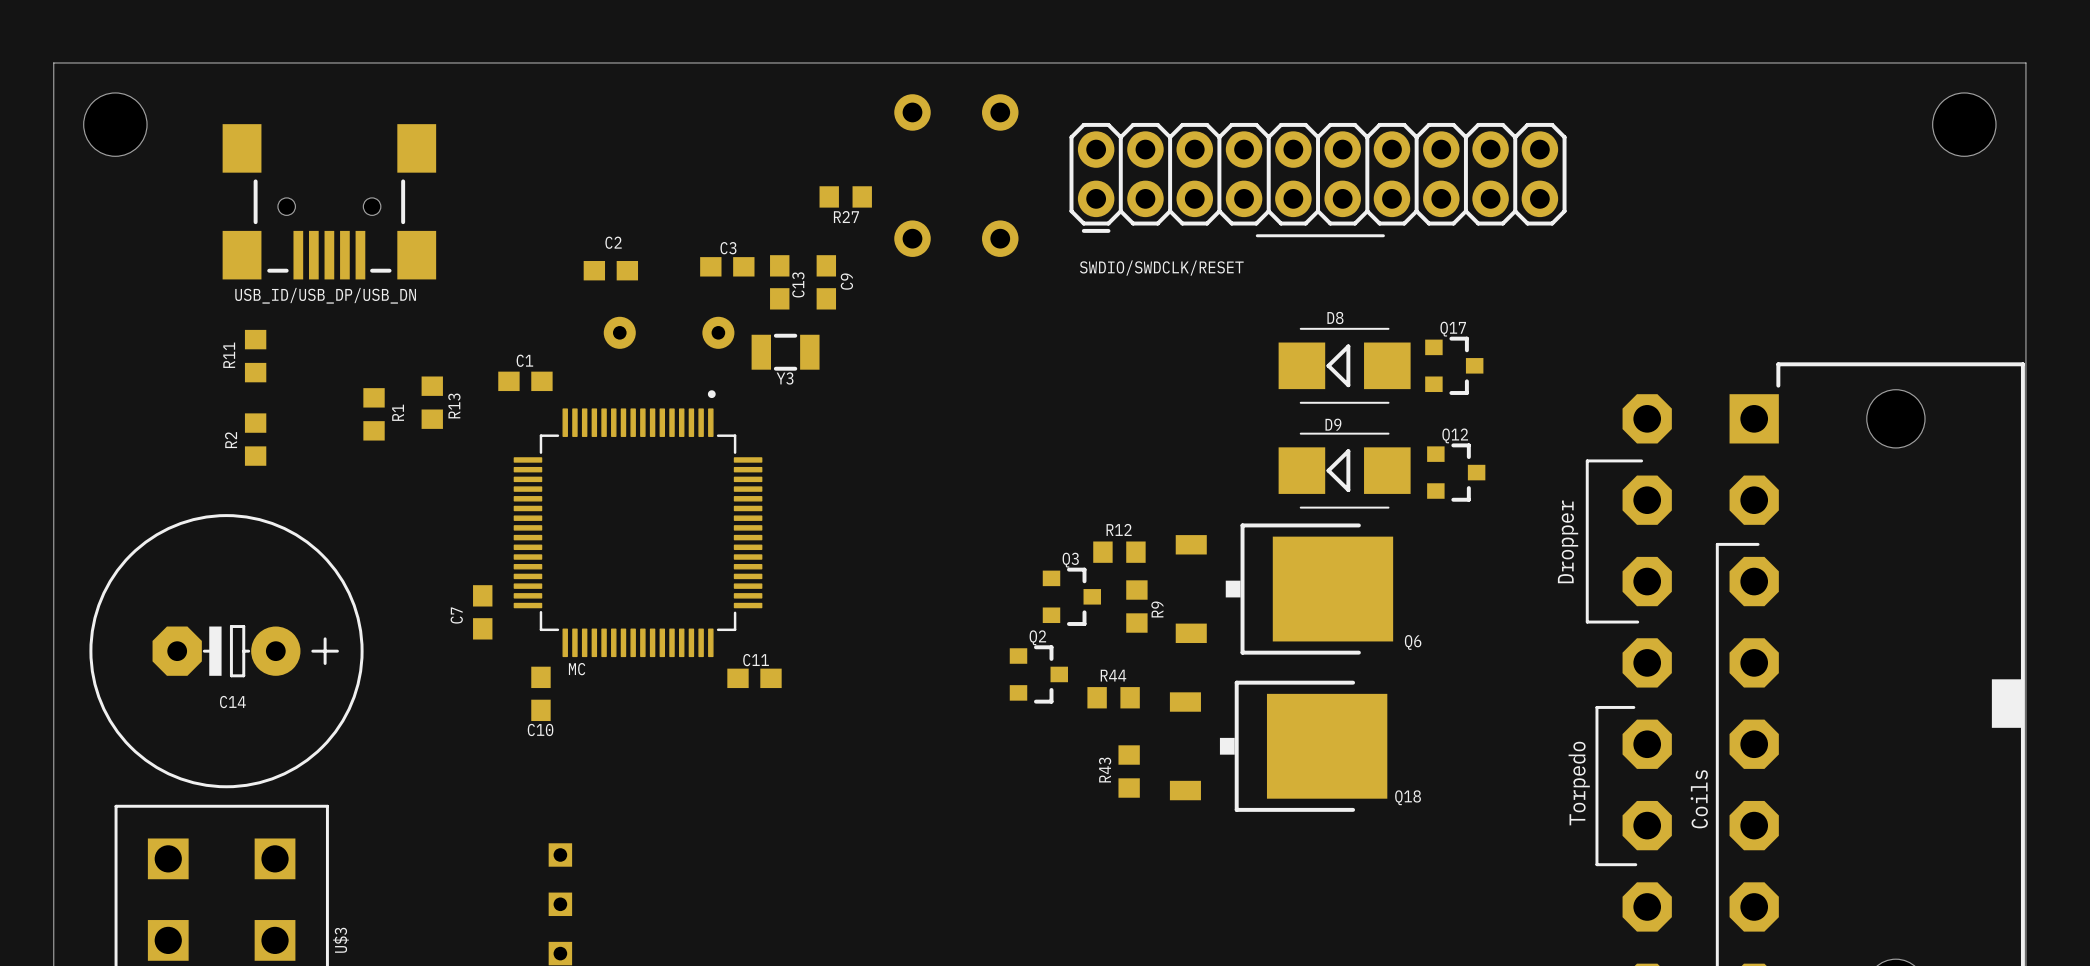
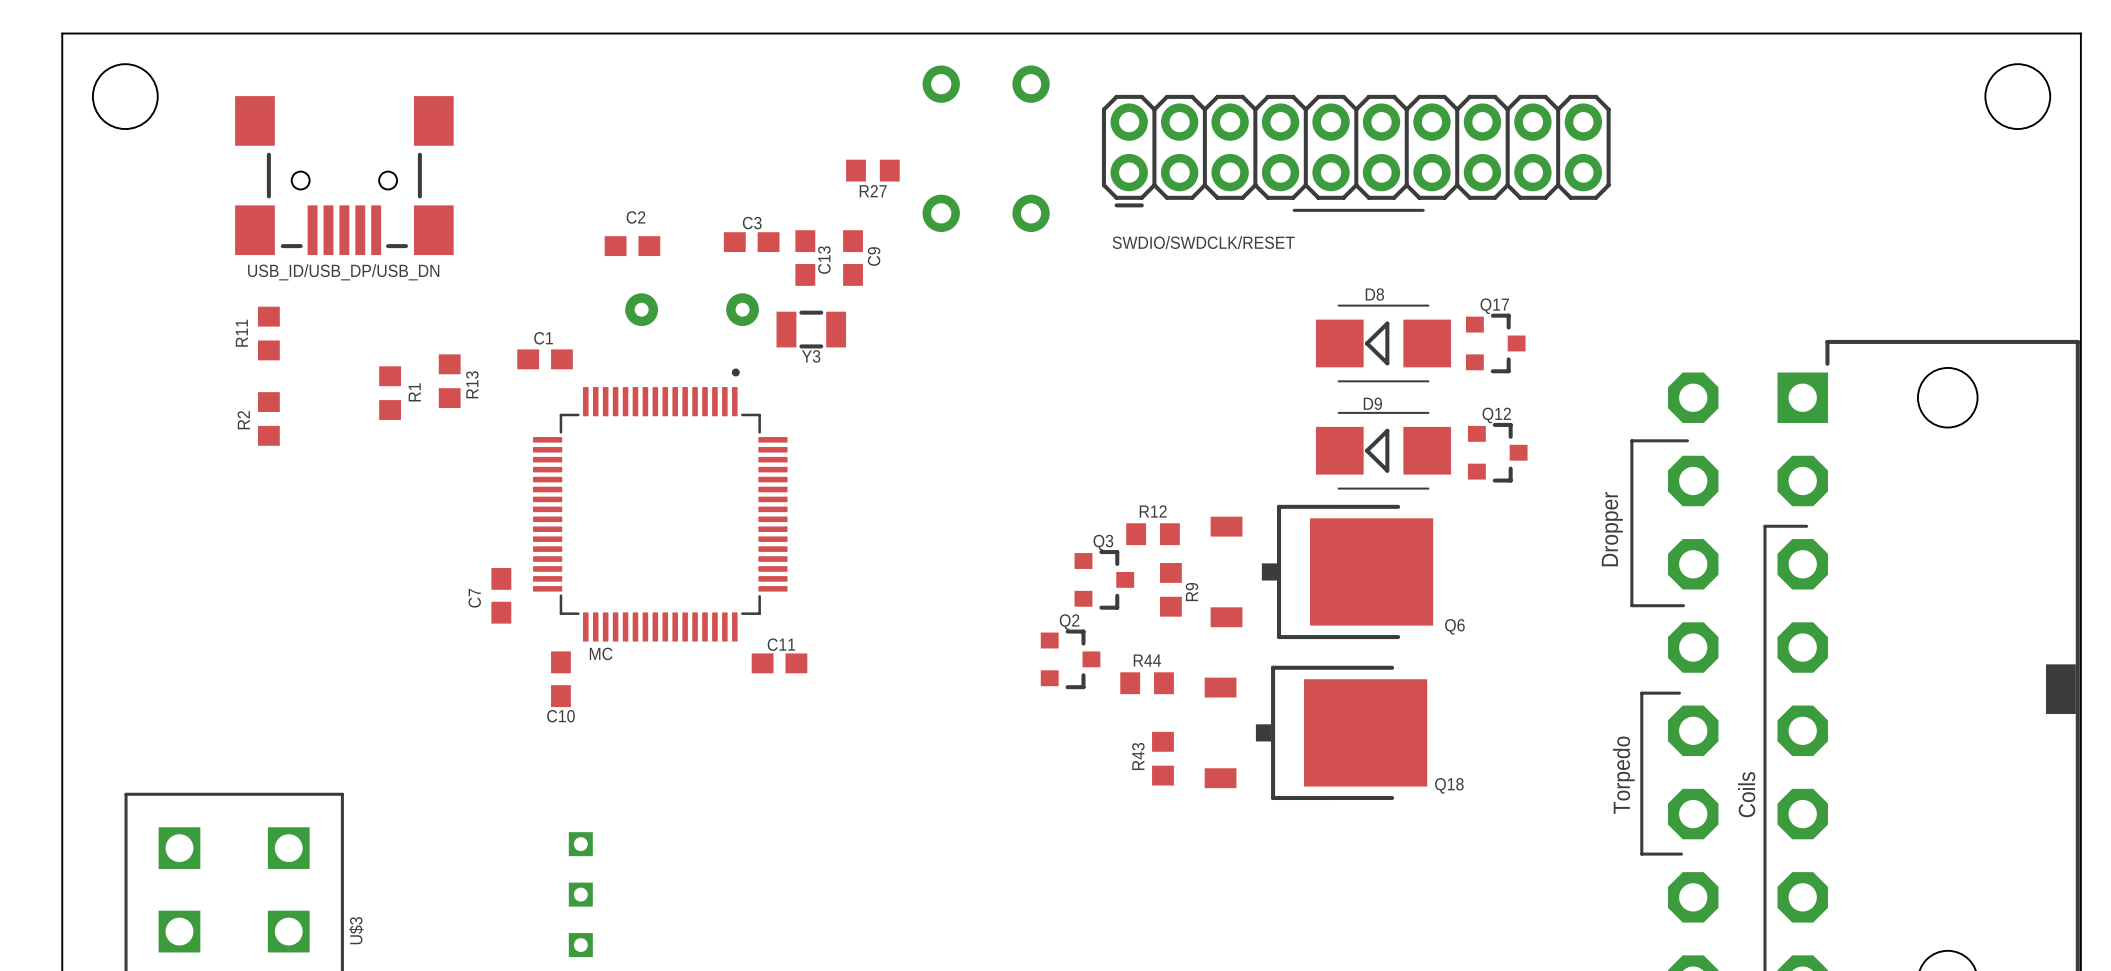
C14: (226, 651) -> none

